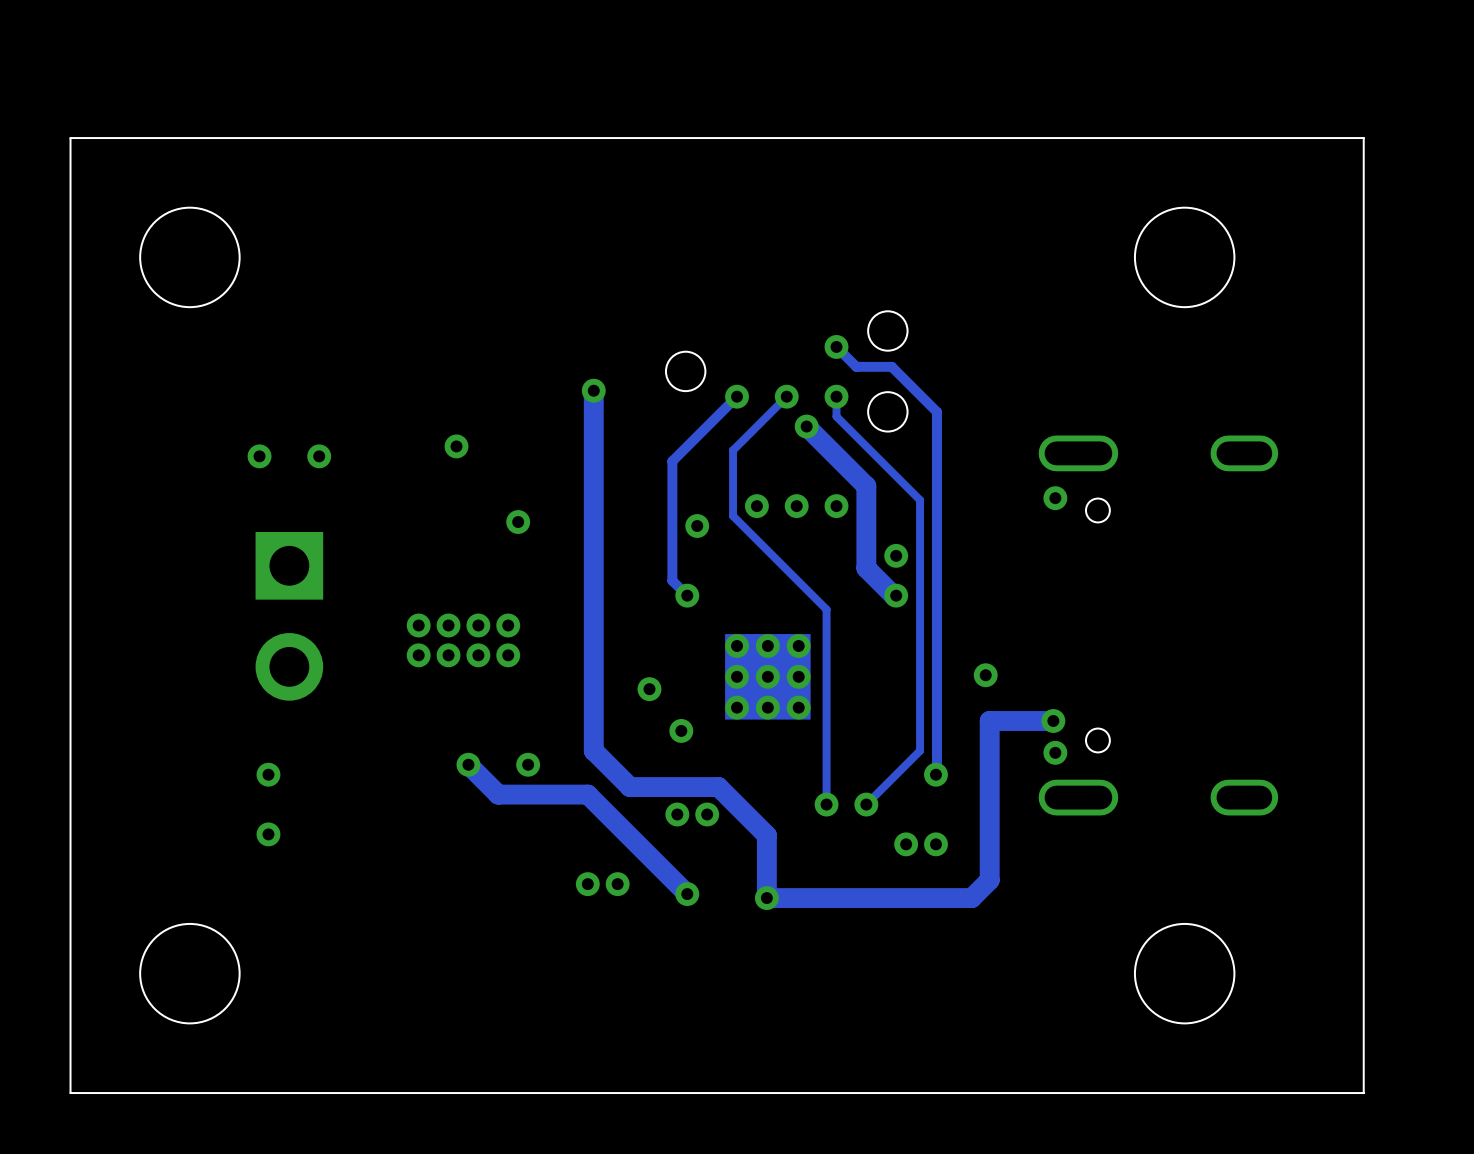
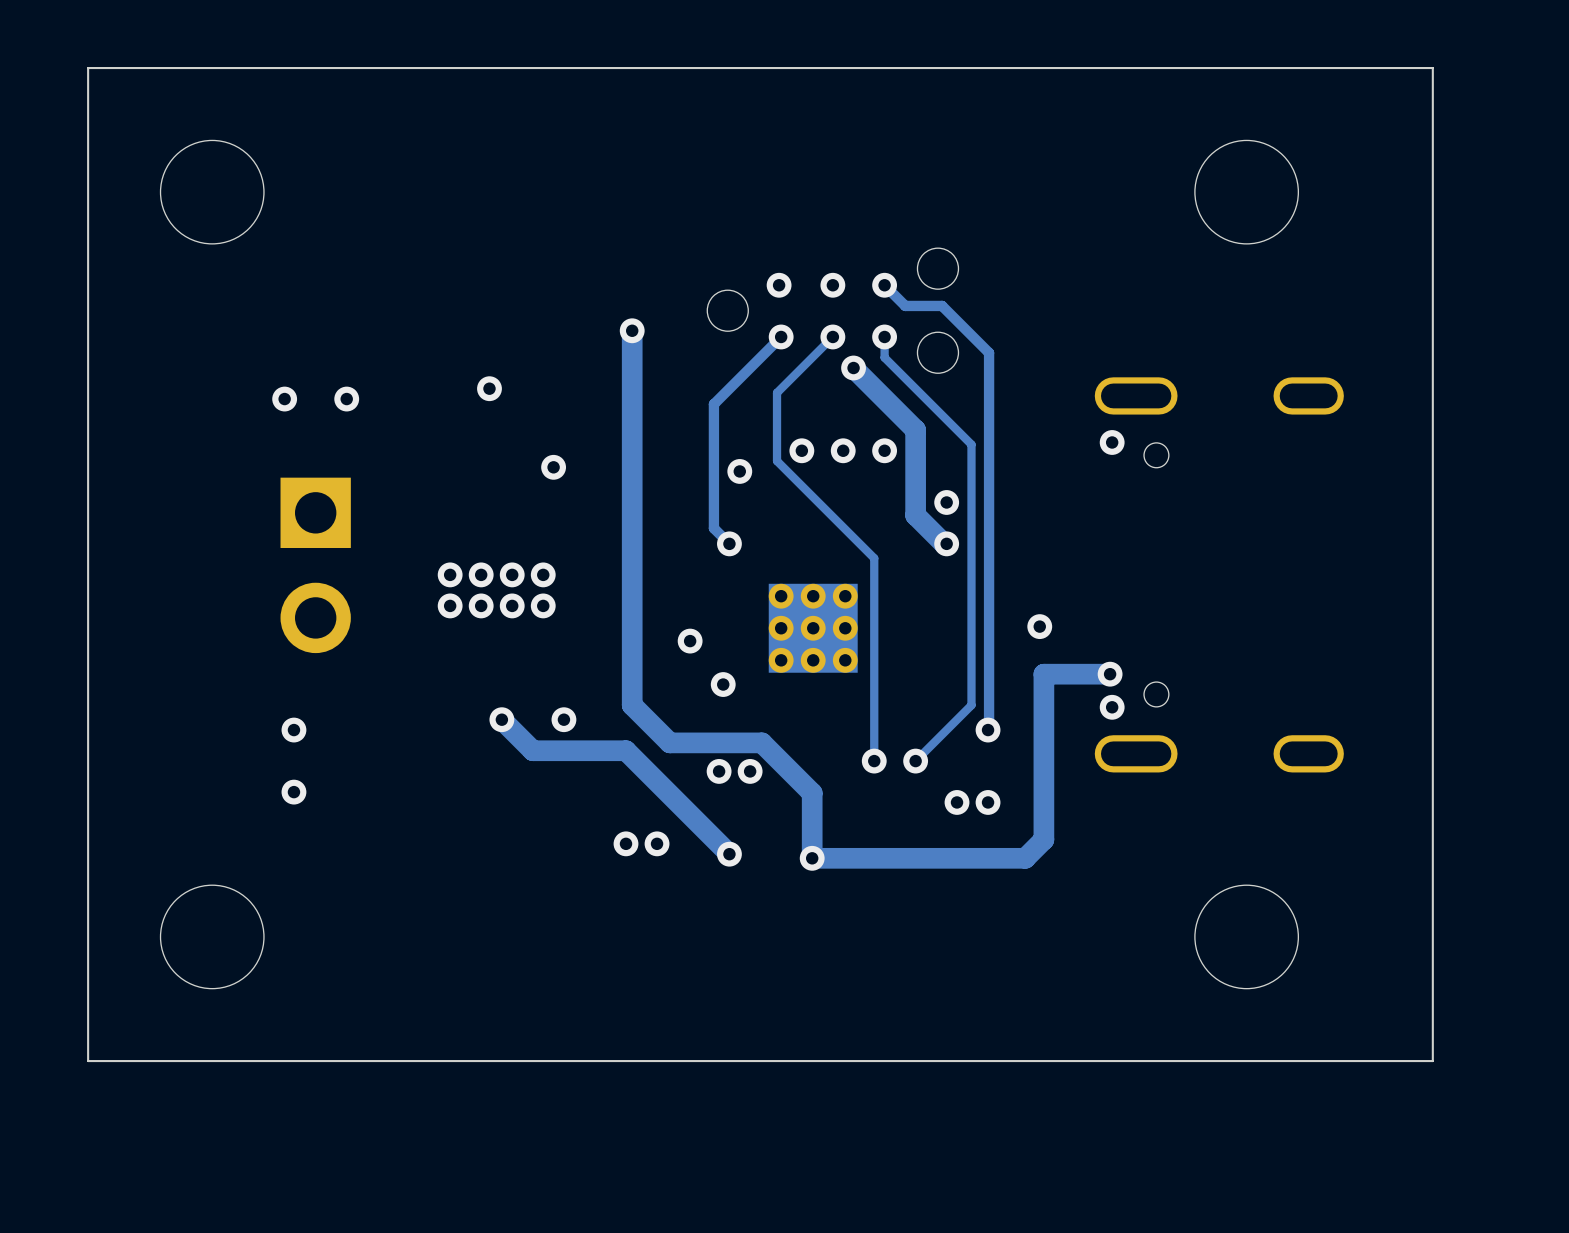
via: none -> (779, 285)
via: none -> (832, 285)

